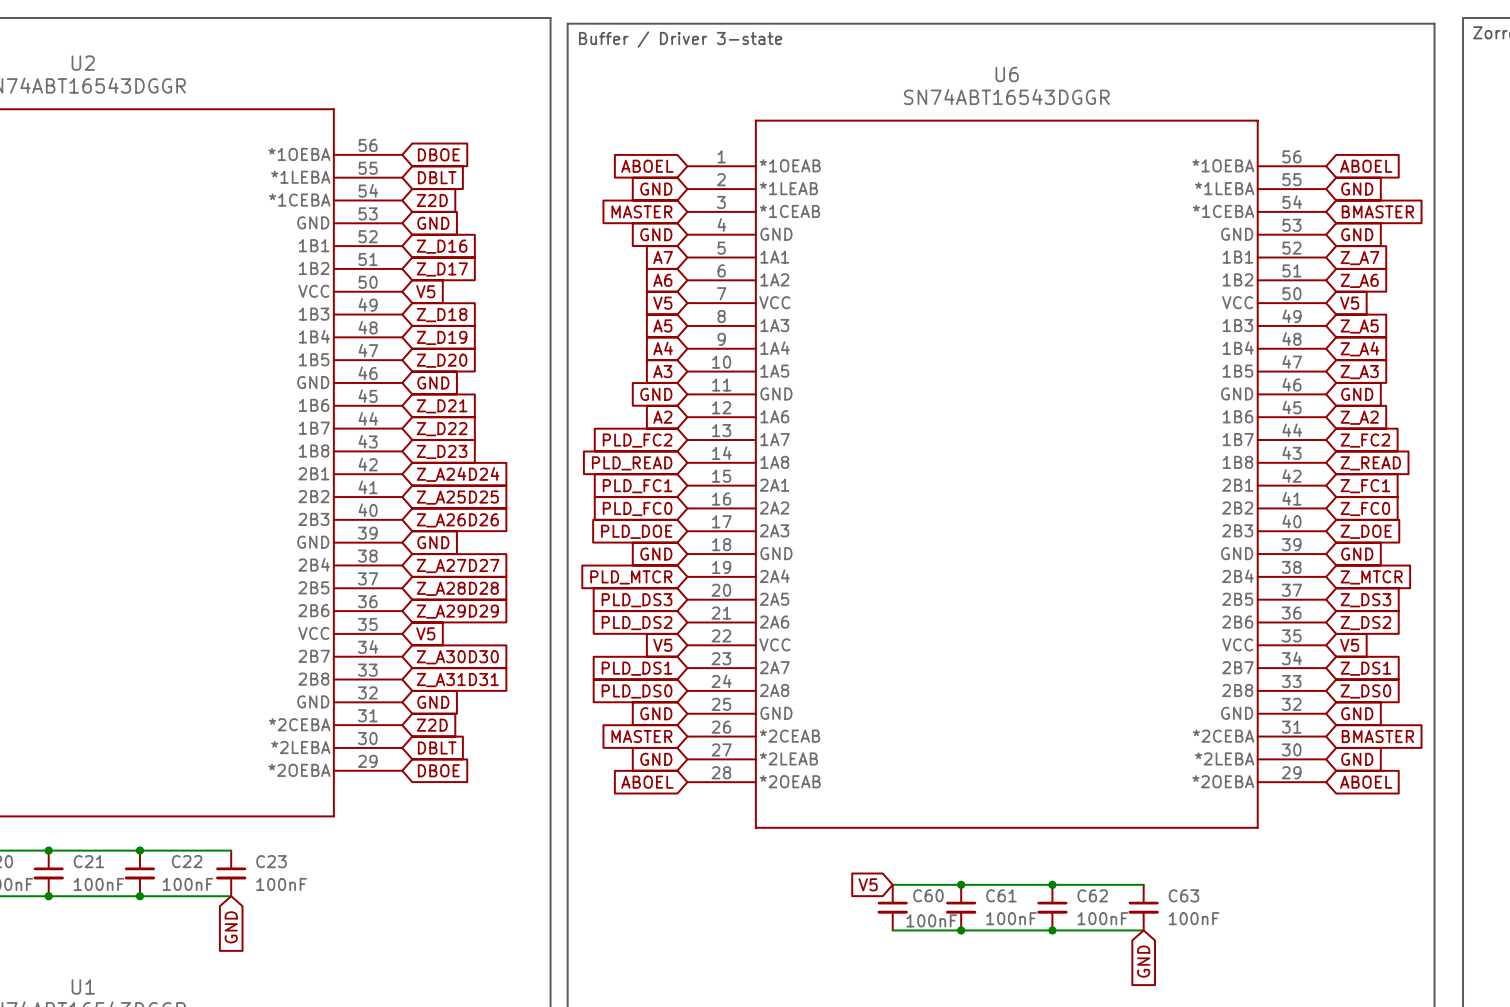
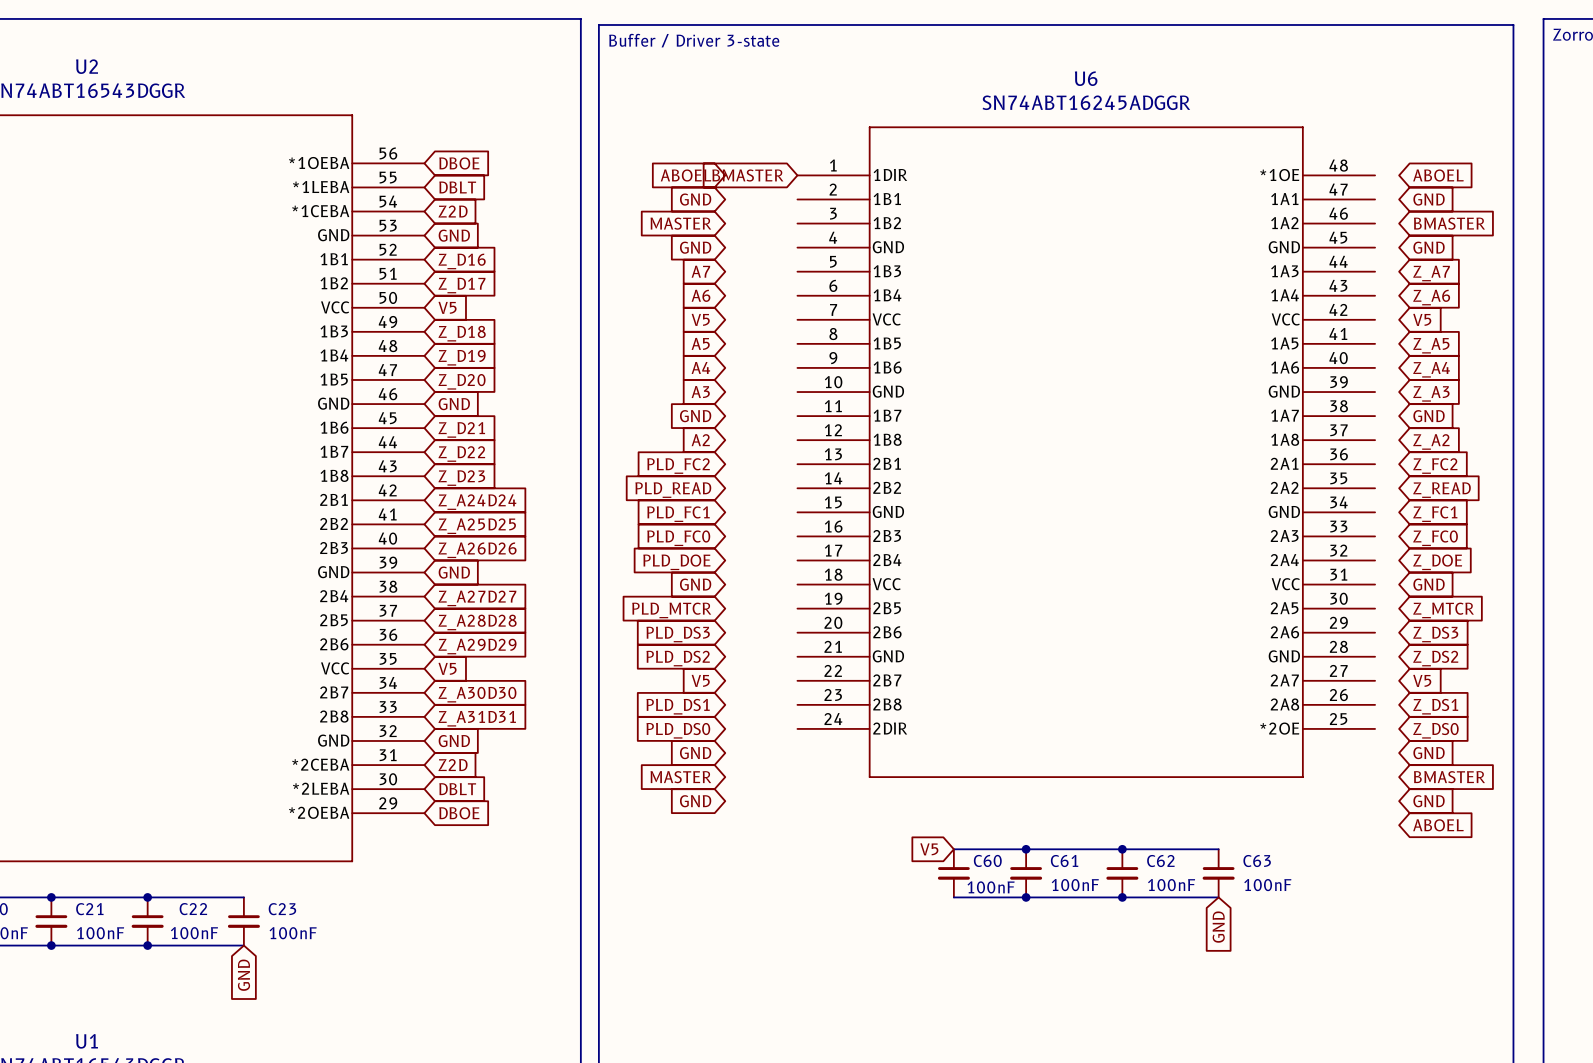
U6 name position: U6 (1007, 74) -> U6 (1086, 78)
U6 value: SN74ABT16543DGGR (1006, 96) -> SN74ABT16245ADGGR (1086, 102)
U6 symbol: [687, 120, 1327, 829] -> [797, 126, 1376, 778]
global label: none -> BMASTER (747, 175)
global label: ABOEL (647, 782) -> none
junction: none -> (1026, 849)
junction: none -> (1122, 849)
global label position: V5 (868, 884) -> V5 (929, 849)
wire: (892, 884) (1143, 884) -> (953, 849) (1218, 849)
junction position: (961, 884) -> (1026, 897)
junction position: (1052, 884) -> (1122, 897)
C60 position: (892, 907) -> (953, 873)
C61 position: (961, 907) -> (1026, 873)
C62 position: (1052, 907) -> (1122, 873)
C63 position: (1143, 907) -> (1218, 873)
wire: (892, 930) (1143, 930) -> (953, 897) (1218, 897)
junction: (961, 930) -> none
junction: (1052, 930) -> none
global label position: GND (1143, 961) -> GND (1218, 927)

